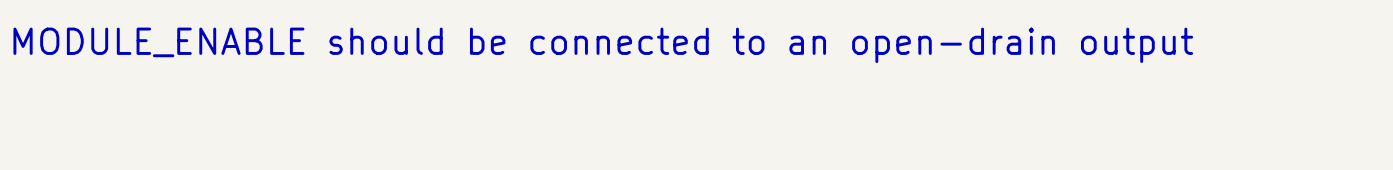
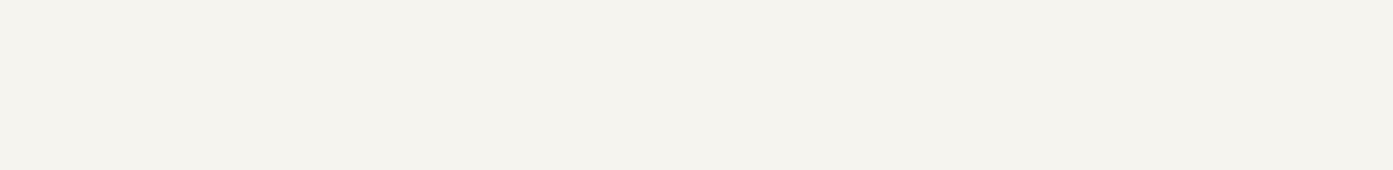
text: MODULE_ENABLE should be connected to an open-drain output (603, 45) -> none

